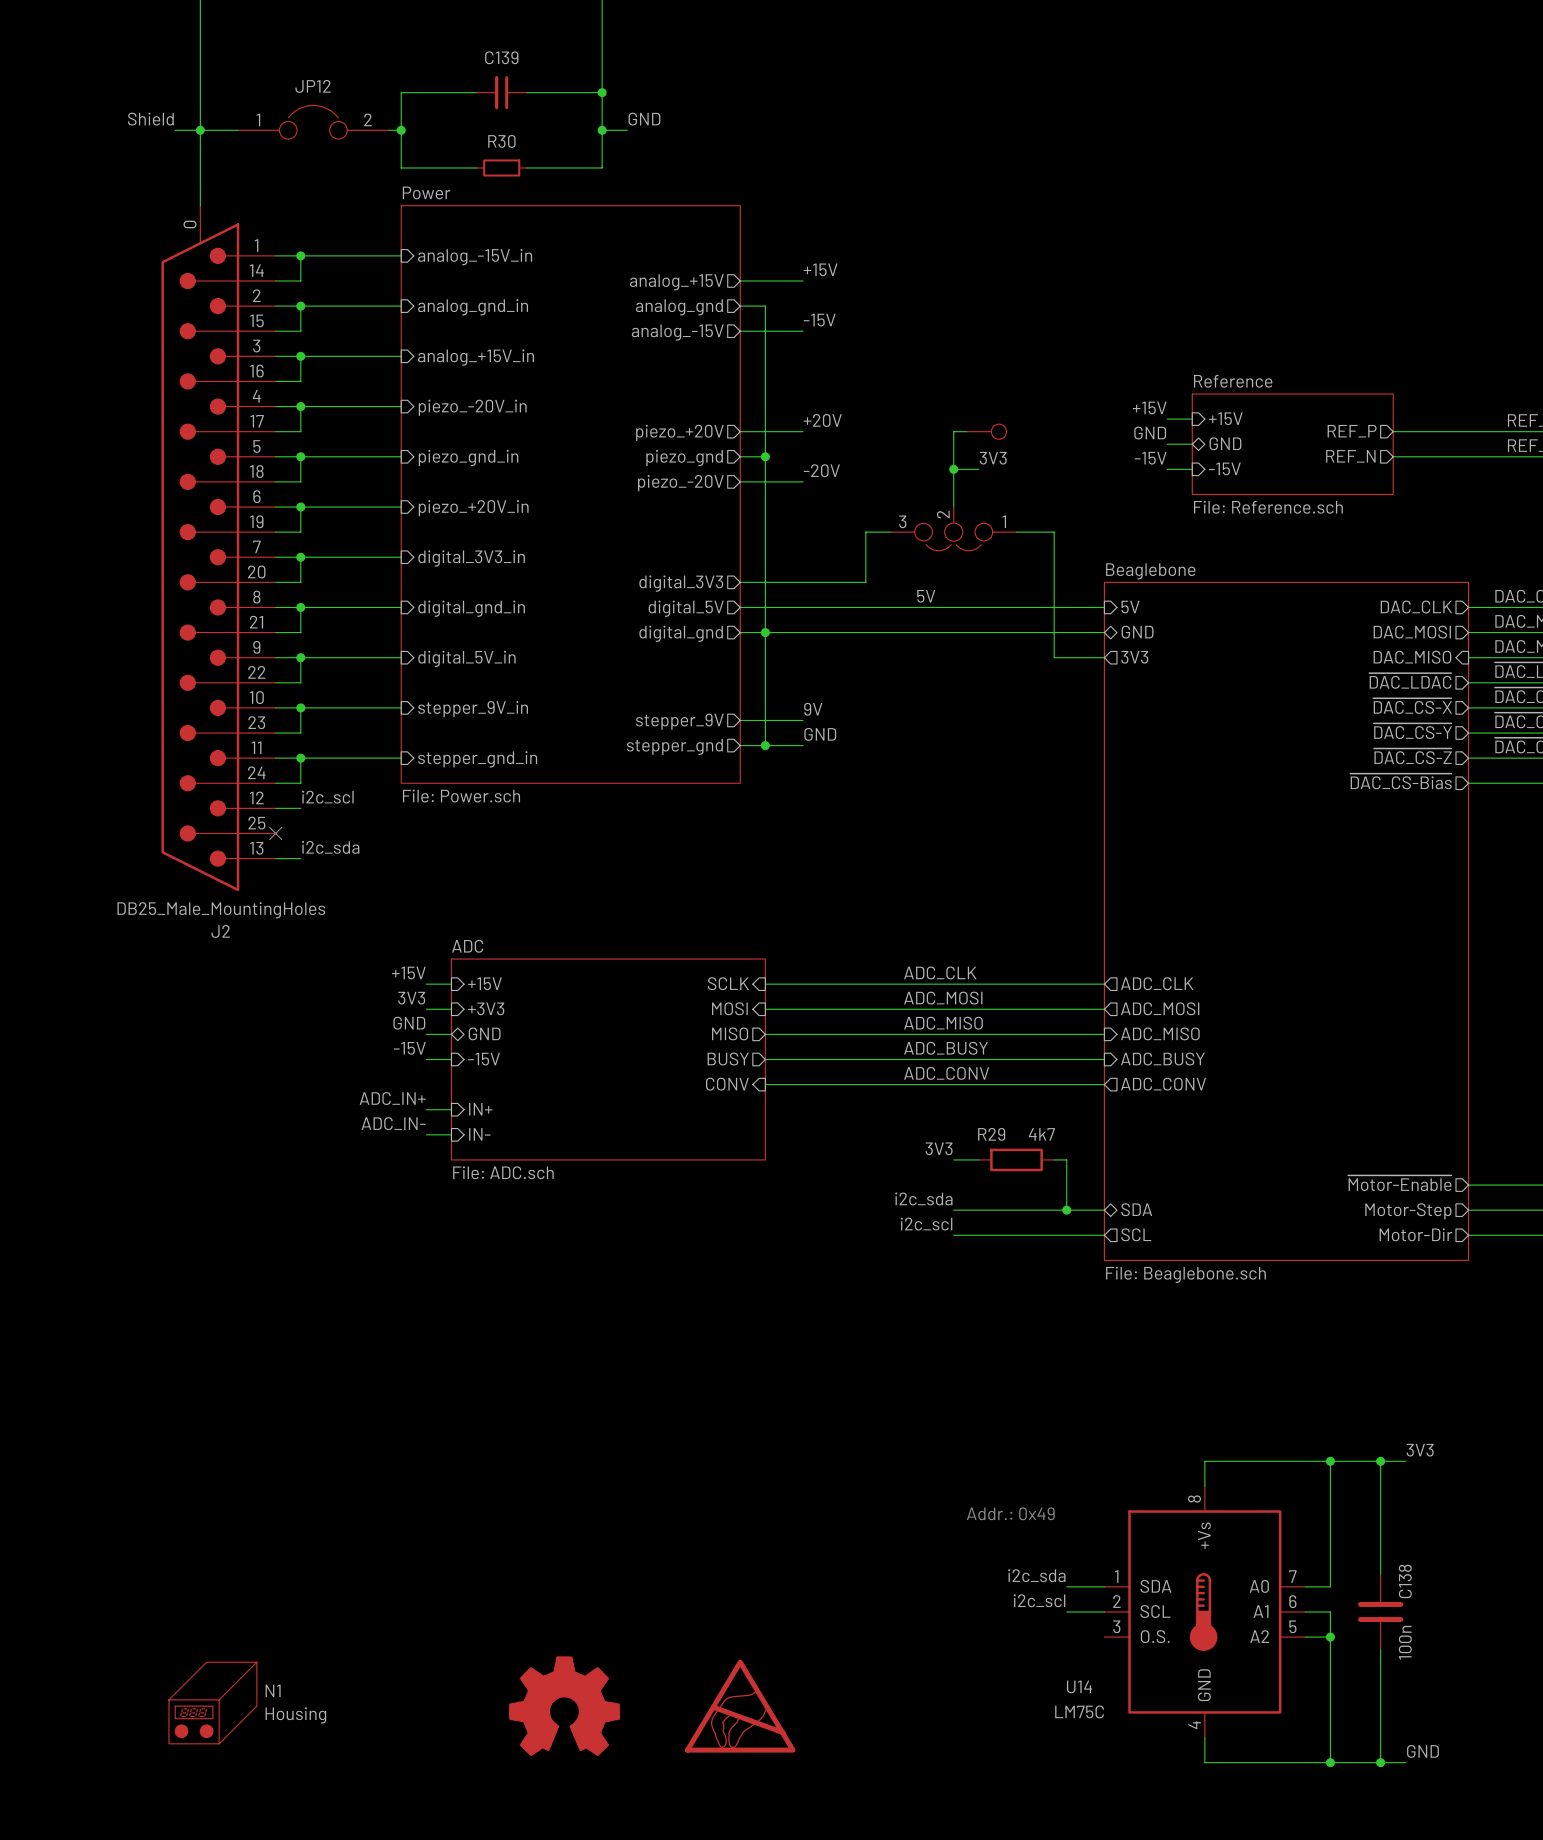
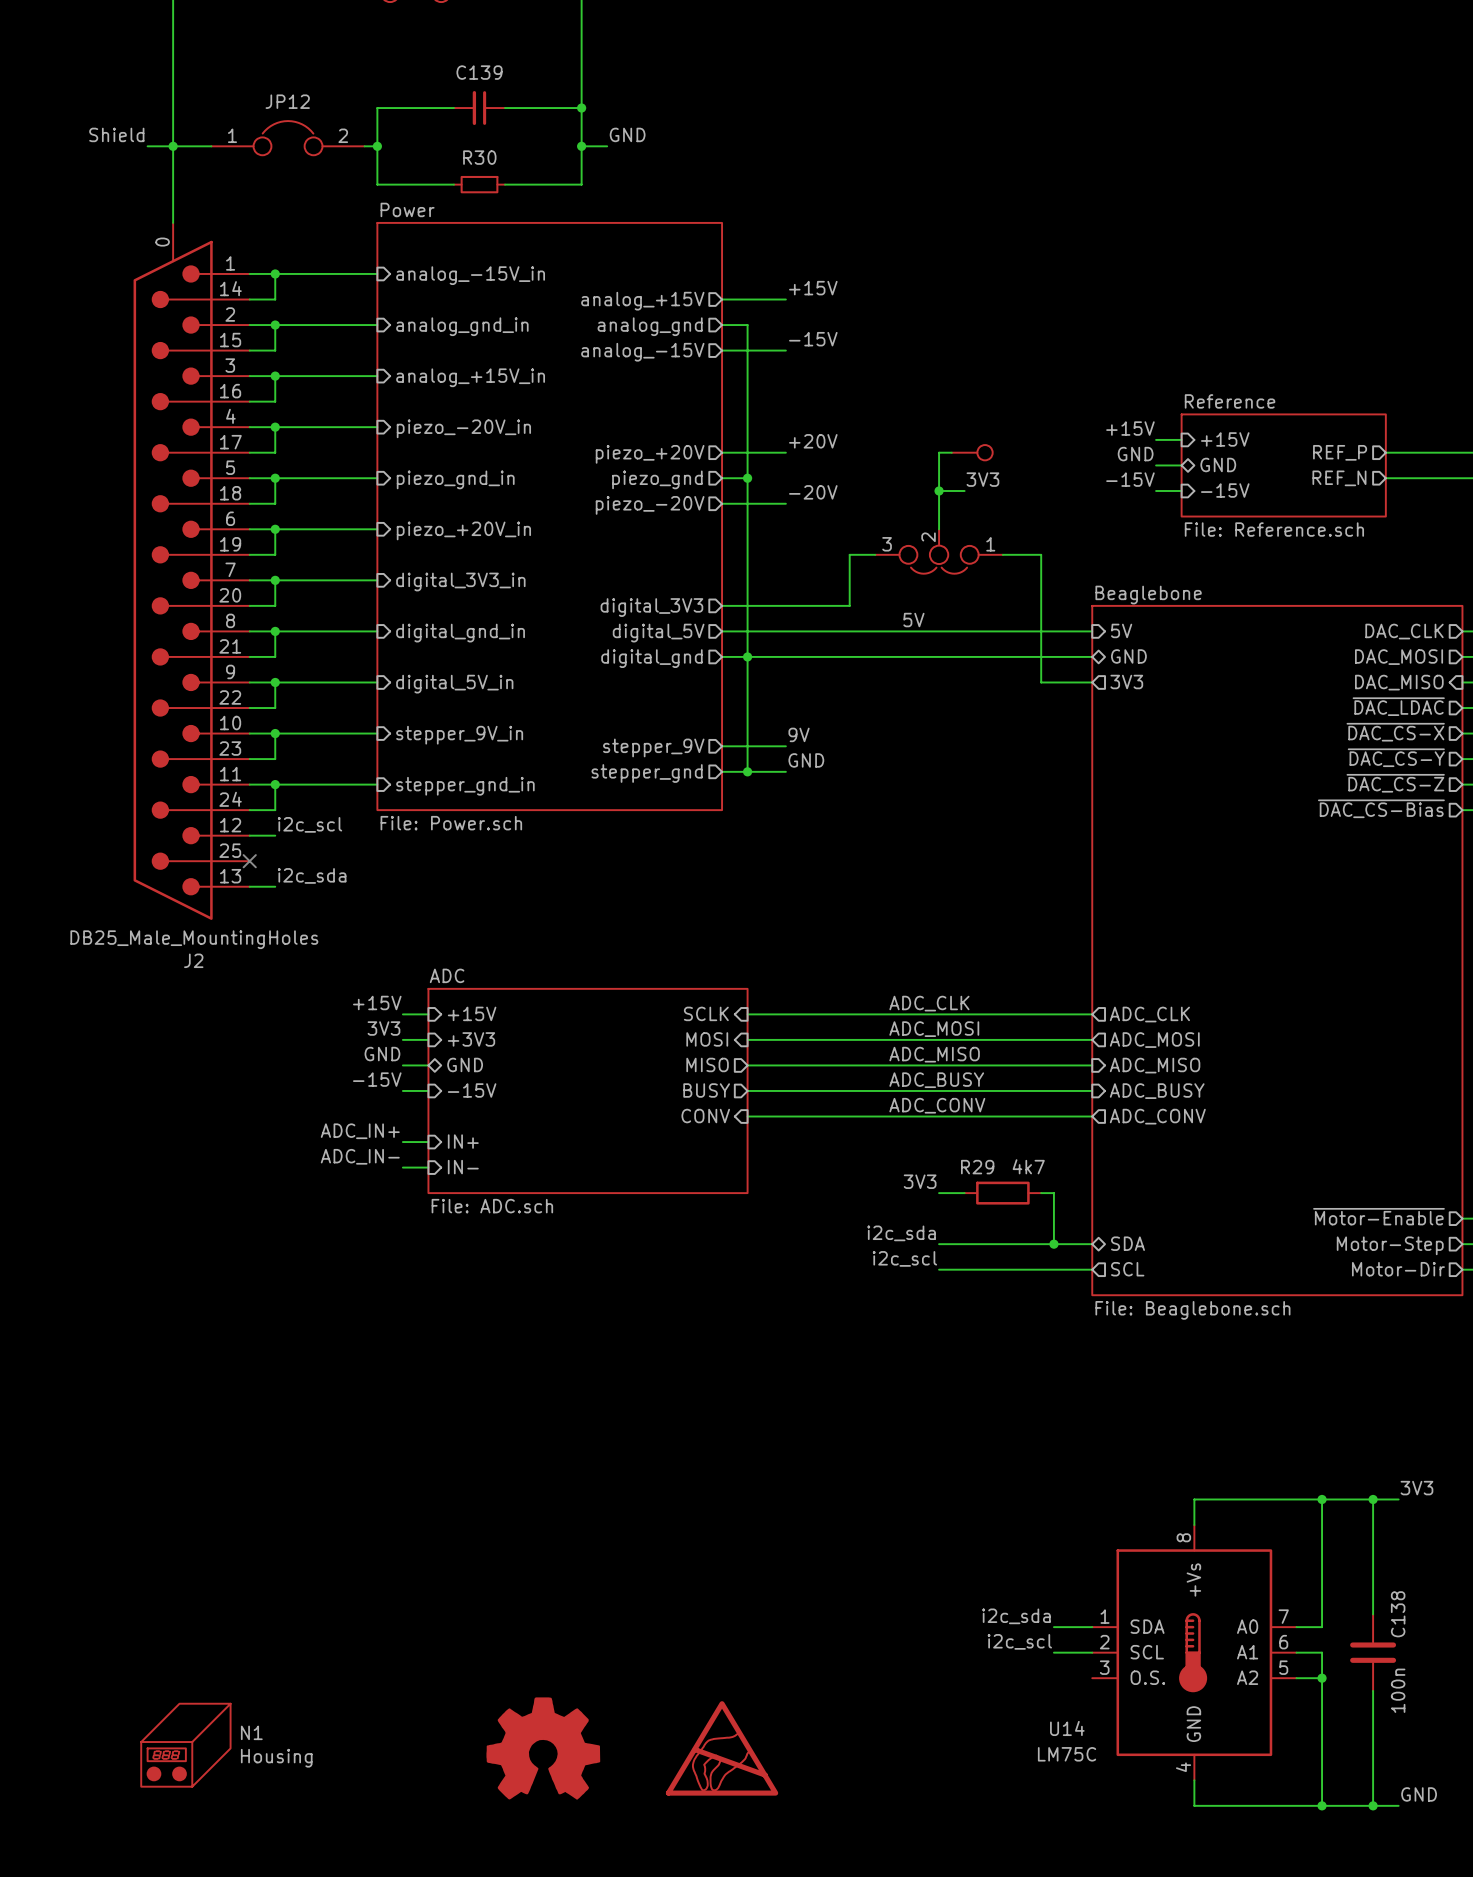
text: Addr.: 0x49 (1010, 1513) -> none

